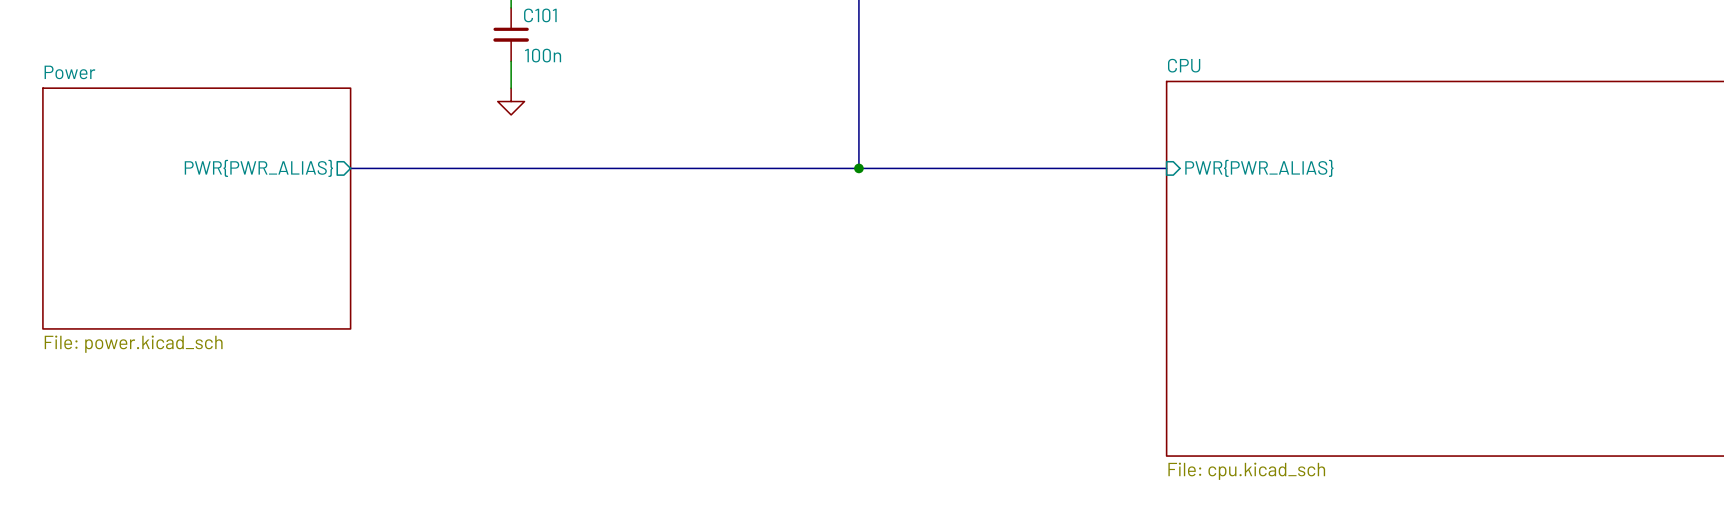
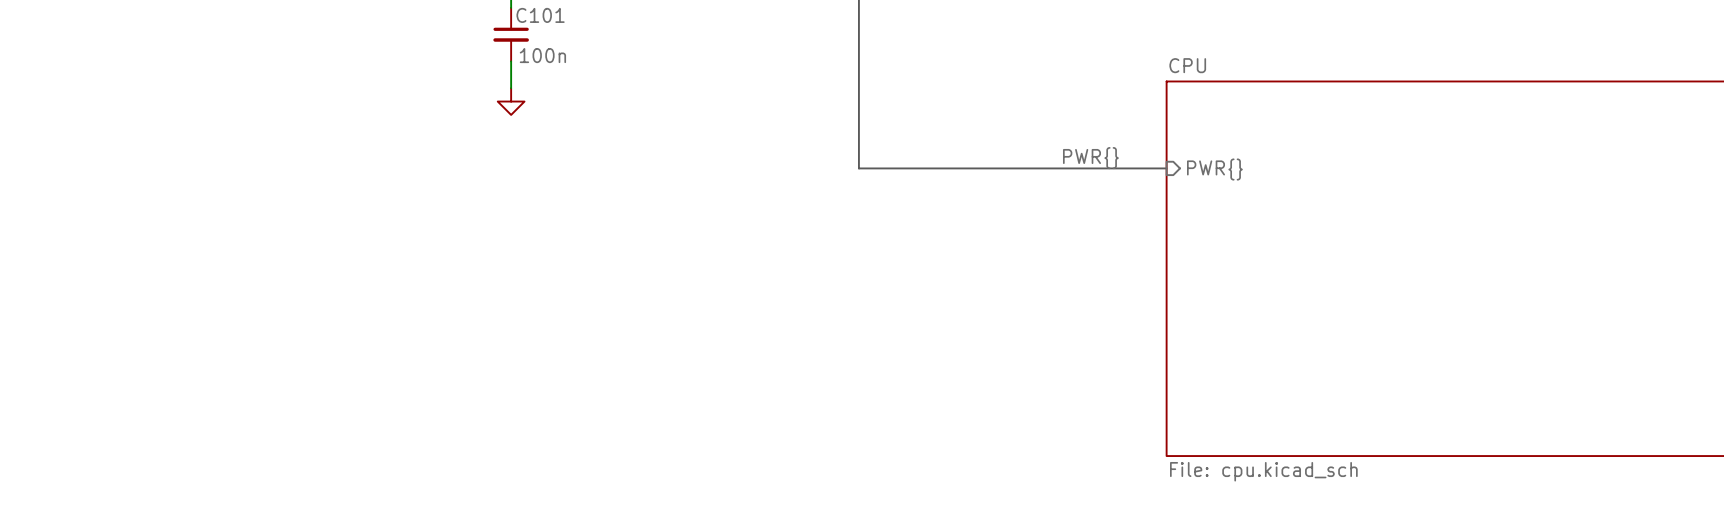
label: none -> PWR{} (1090, 158)
sheet pin: PWR{PWR_ALIAS} (258, 168) -> none
bus: (350, 168) (858, 168) -> none
junction: (858, 168) -> none
sheet pin: PWR{PWR_ALIAS} (1259, 168) -> PWR{} (1214, 169)
sheet Power: File: power.kicad_sch (196, 208) -> none

